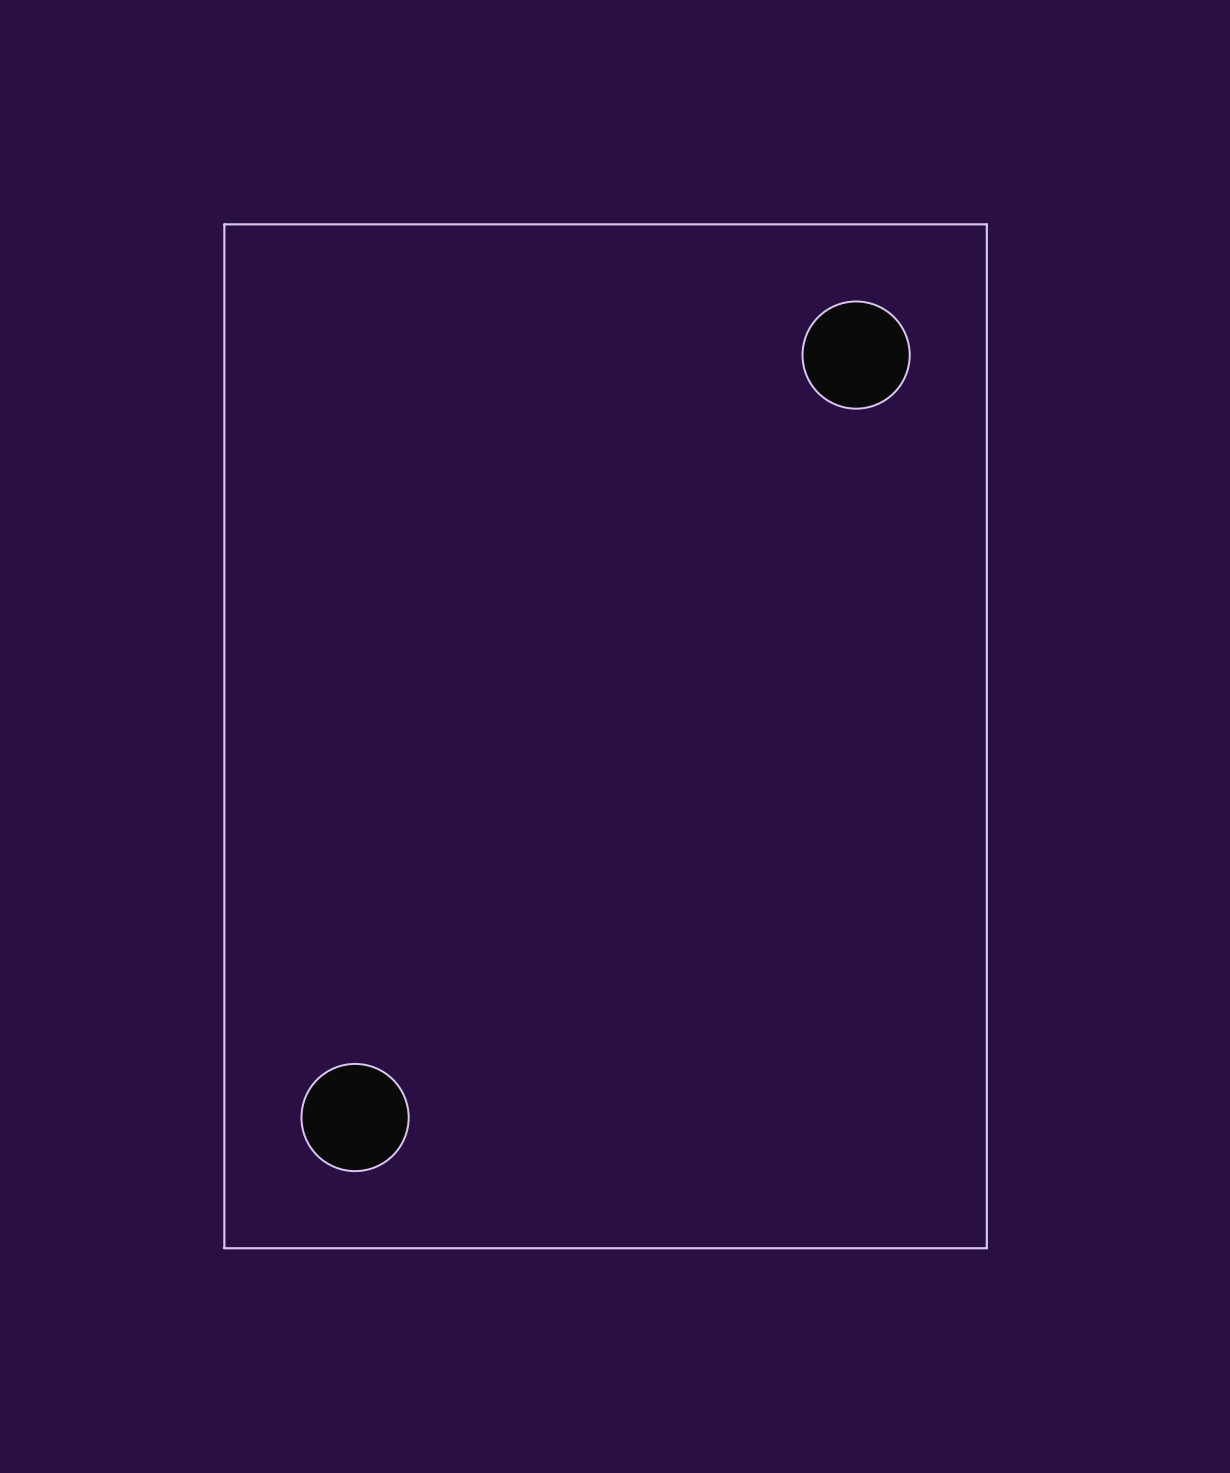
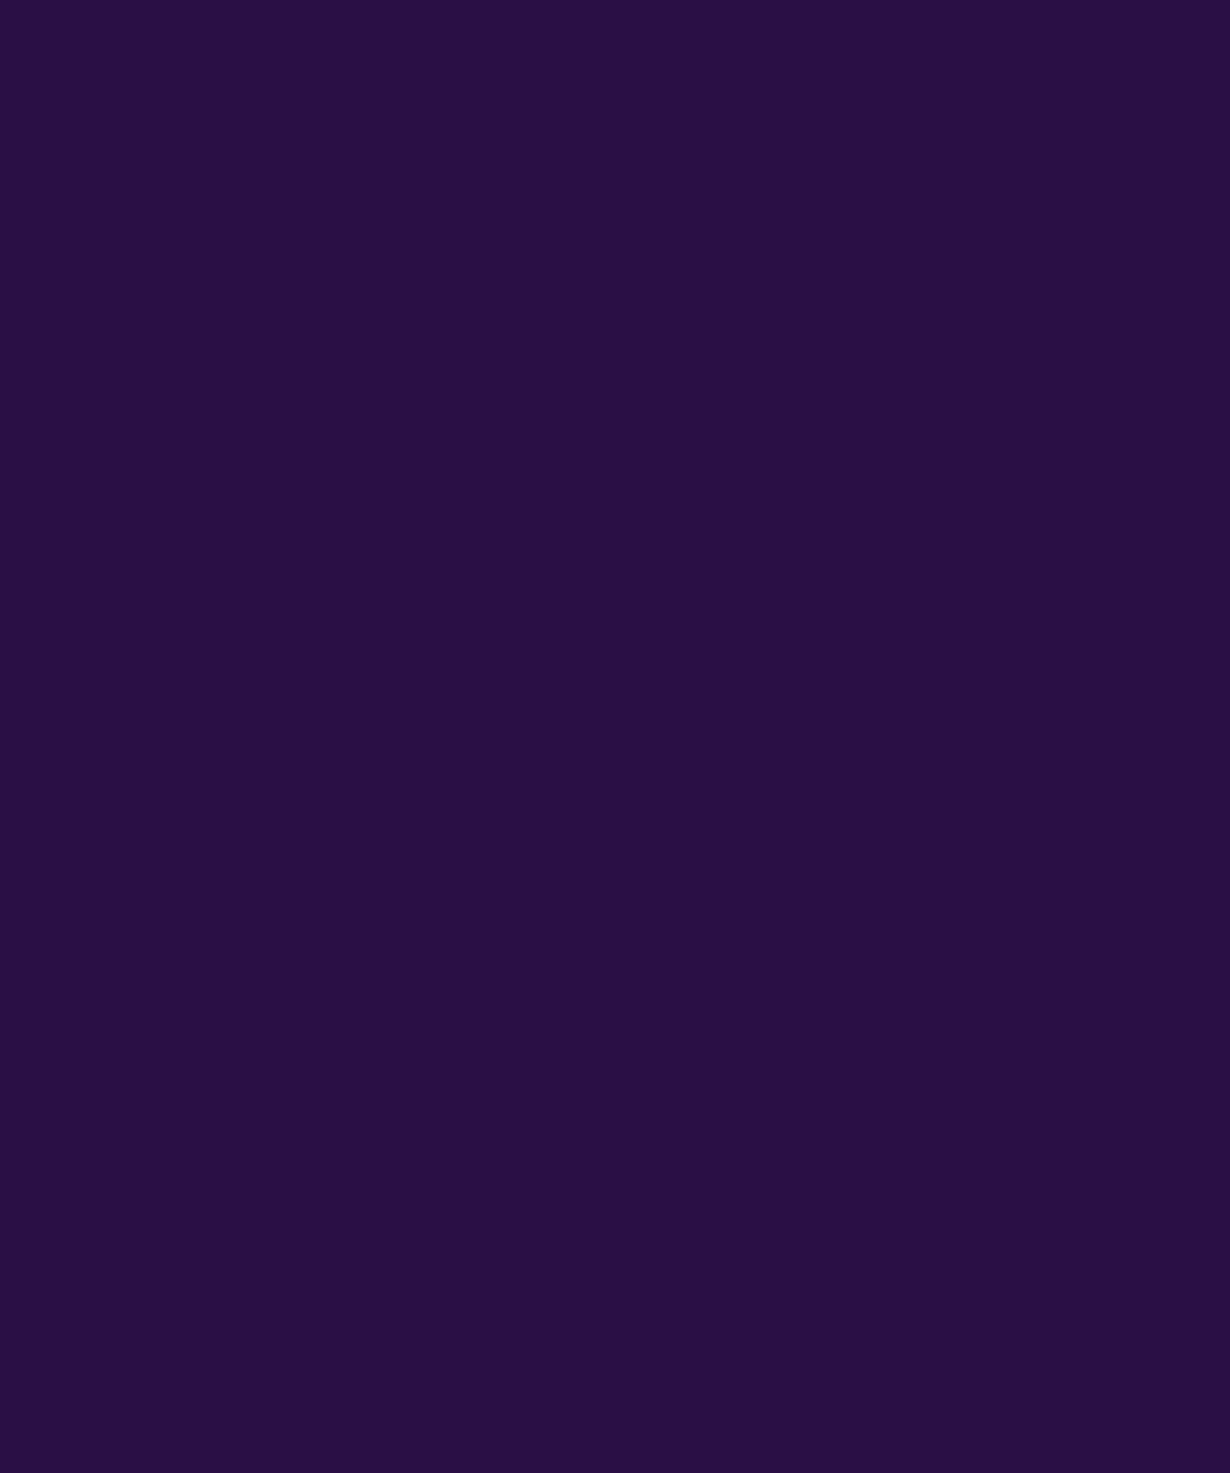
board edge: (986, 224) (224, 224) (224, 1248) (986, 1248) (986, 224) -> none
part: (856, 355) -> none
part: (355, 1117) -> none

